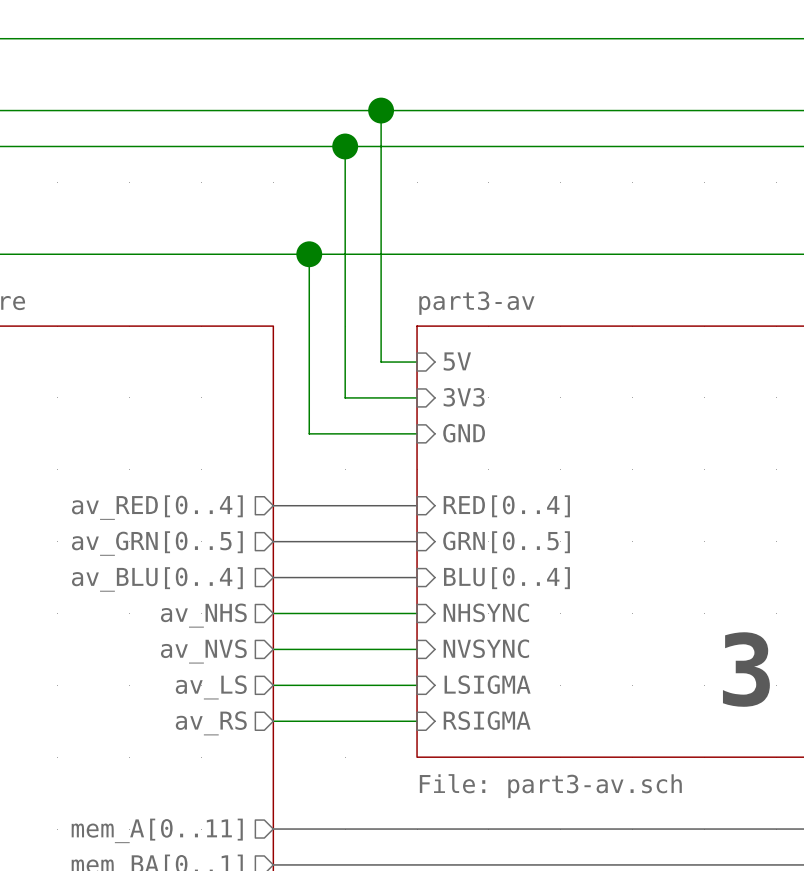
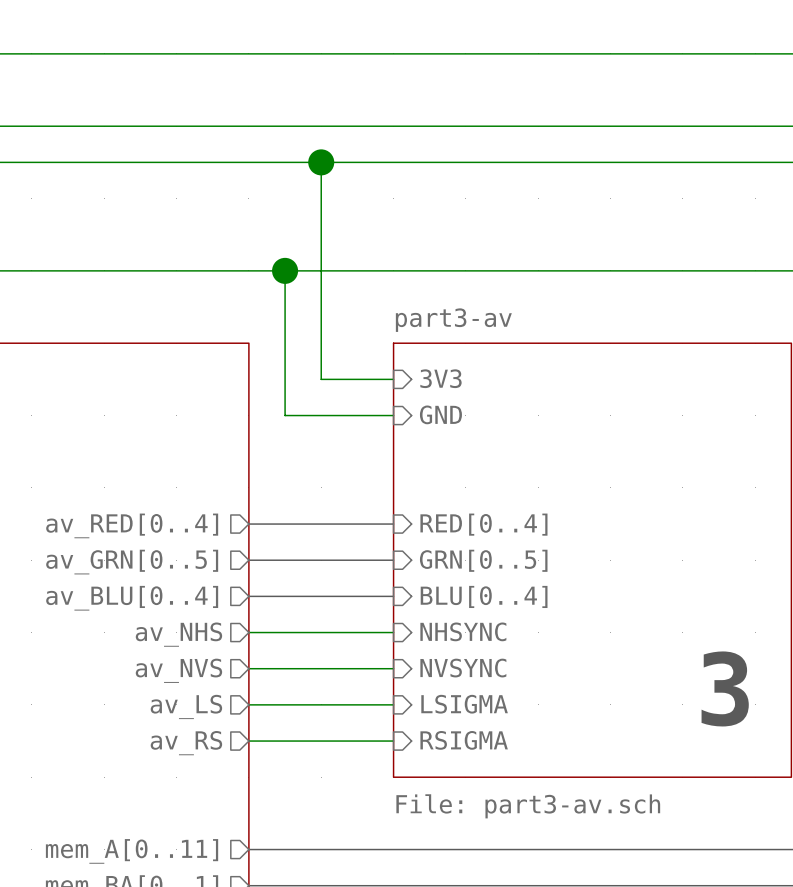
wire: (381, 110) (381, 362) -> (321, 379) (357, 379)
junction: (381, 110) -> none
sheet pin: 5V (457, 361) -> 3V3 (441, 378)
wire: (345, 362) (345, 397) -> (285, 415) (321, 415)
wire: (309, 397) (309, 433) (417, 433) -> none
sheet pin: 3V3 (464, 397) -> GND (440, 414)
sheet pin: GND (464, 433) -> none

